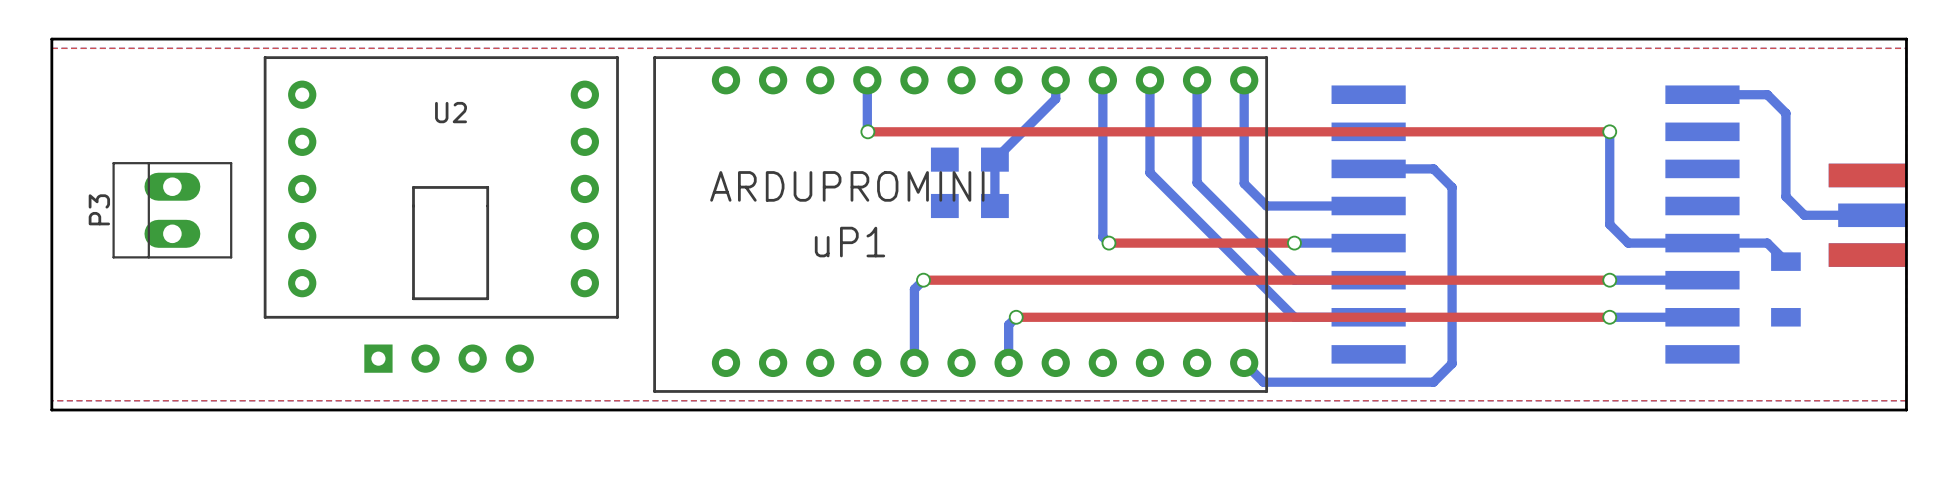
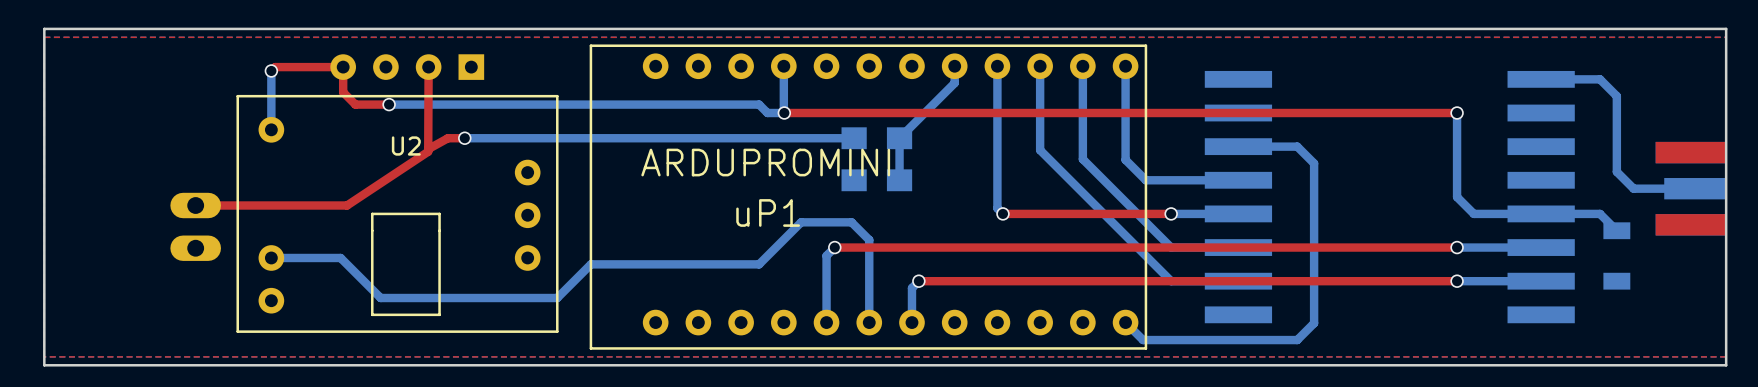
U2 footprint: [263, 56, 619, 319] -> [236, 94, 559, 333]
top track: none -> (428, 67) (428, 149)
bottom track: none -> (271, 70) (271, 129)
top track: none -> (271, 70) (275, 67) (343, 67) (343, 92) (355, 104) (389, 104)
via: none -> (271, 70)
bottom track: none -> (389, 104) (759, 104) (767, 113) (784, 113)
via: none -> (389, 104)
bottom track: none -> (464, 138) (854, 138)
top track: none -> (464, 138) (447, 138) (428, 149)
via: none -> (464, 138)
top track: none -> (428, 149) (428, 151) (347, 205) (195, 205)
P3 side: top (172, 210) -> bottom (195, 226)
bottom track: none -> (271, 257) (340, 257) (380, 298) (557, 298) (590, 264) (759, 264) (801, 222) (851, 222) (869, 239) (869, 322)
part rotation: 0° (449, 358) -> 180° (407, 67)
part position: (449, 358) -> (407, 67)

